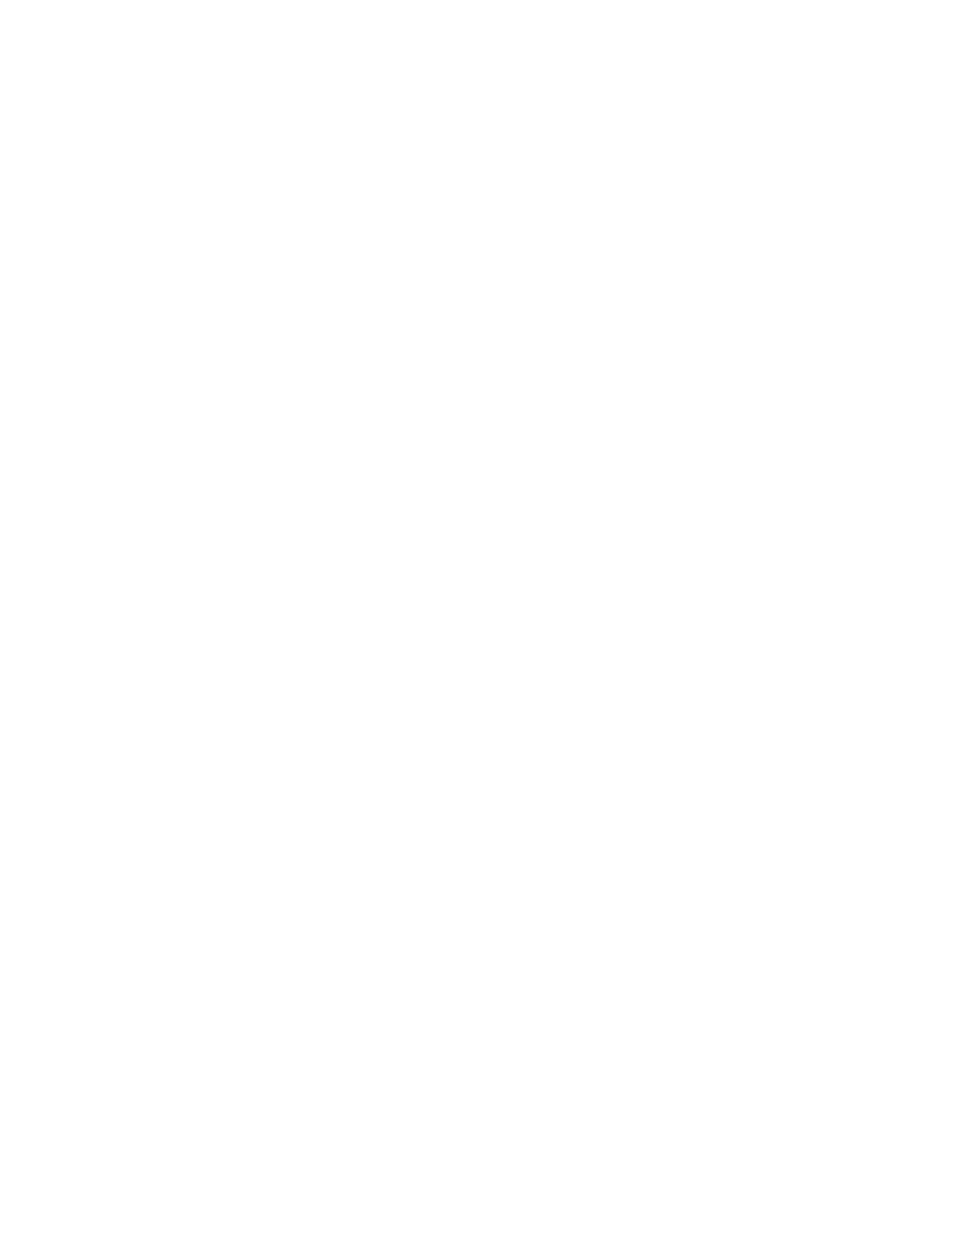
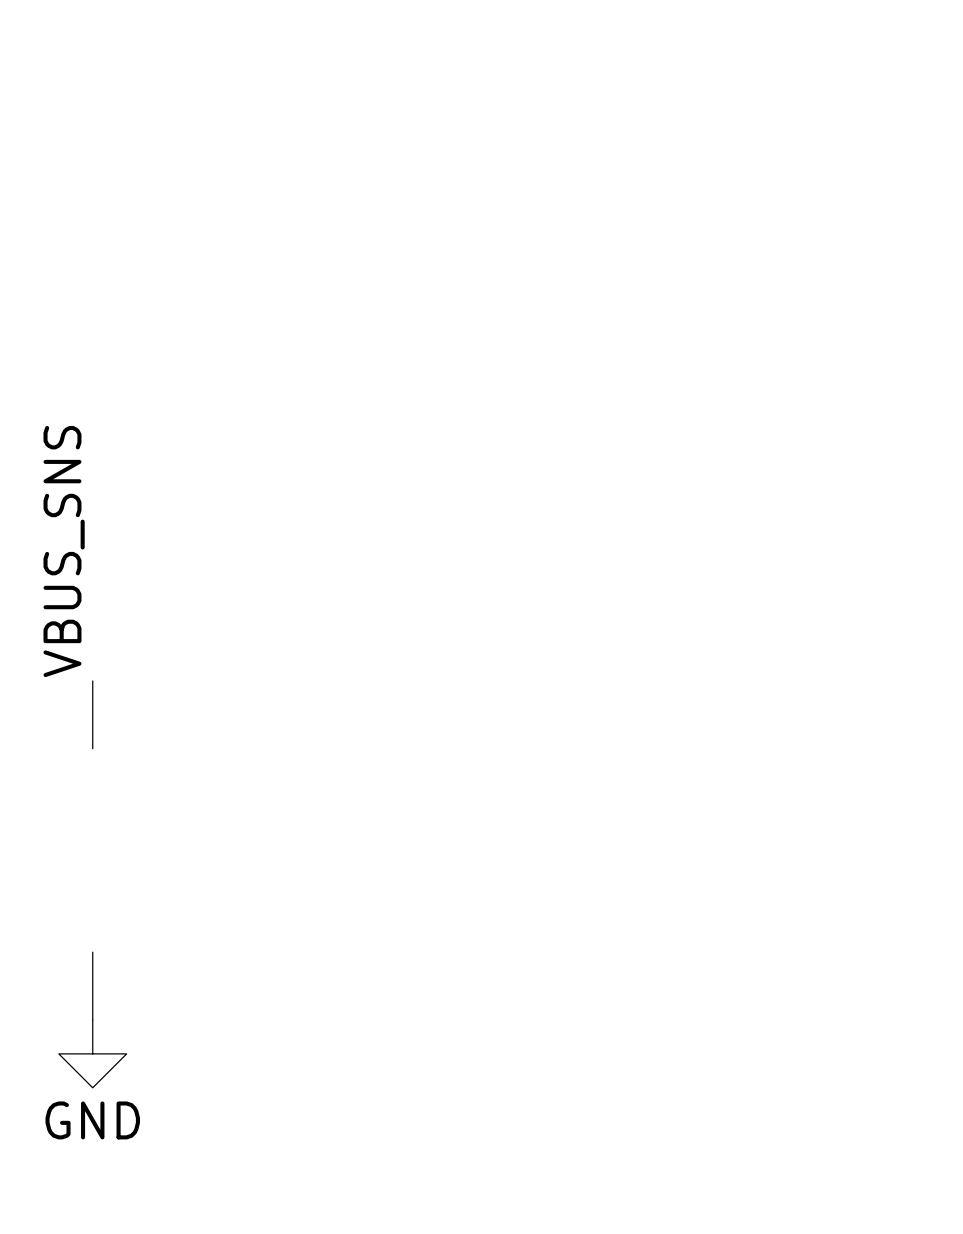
label: none -> VBUS_SNS (64, 551)
wire: none -> (92, 680) (92, 748)
wire: none -> (92, 952) (92, 1019)
power symbol: none -> GND (92, 1053)

